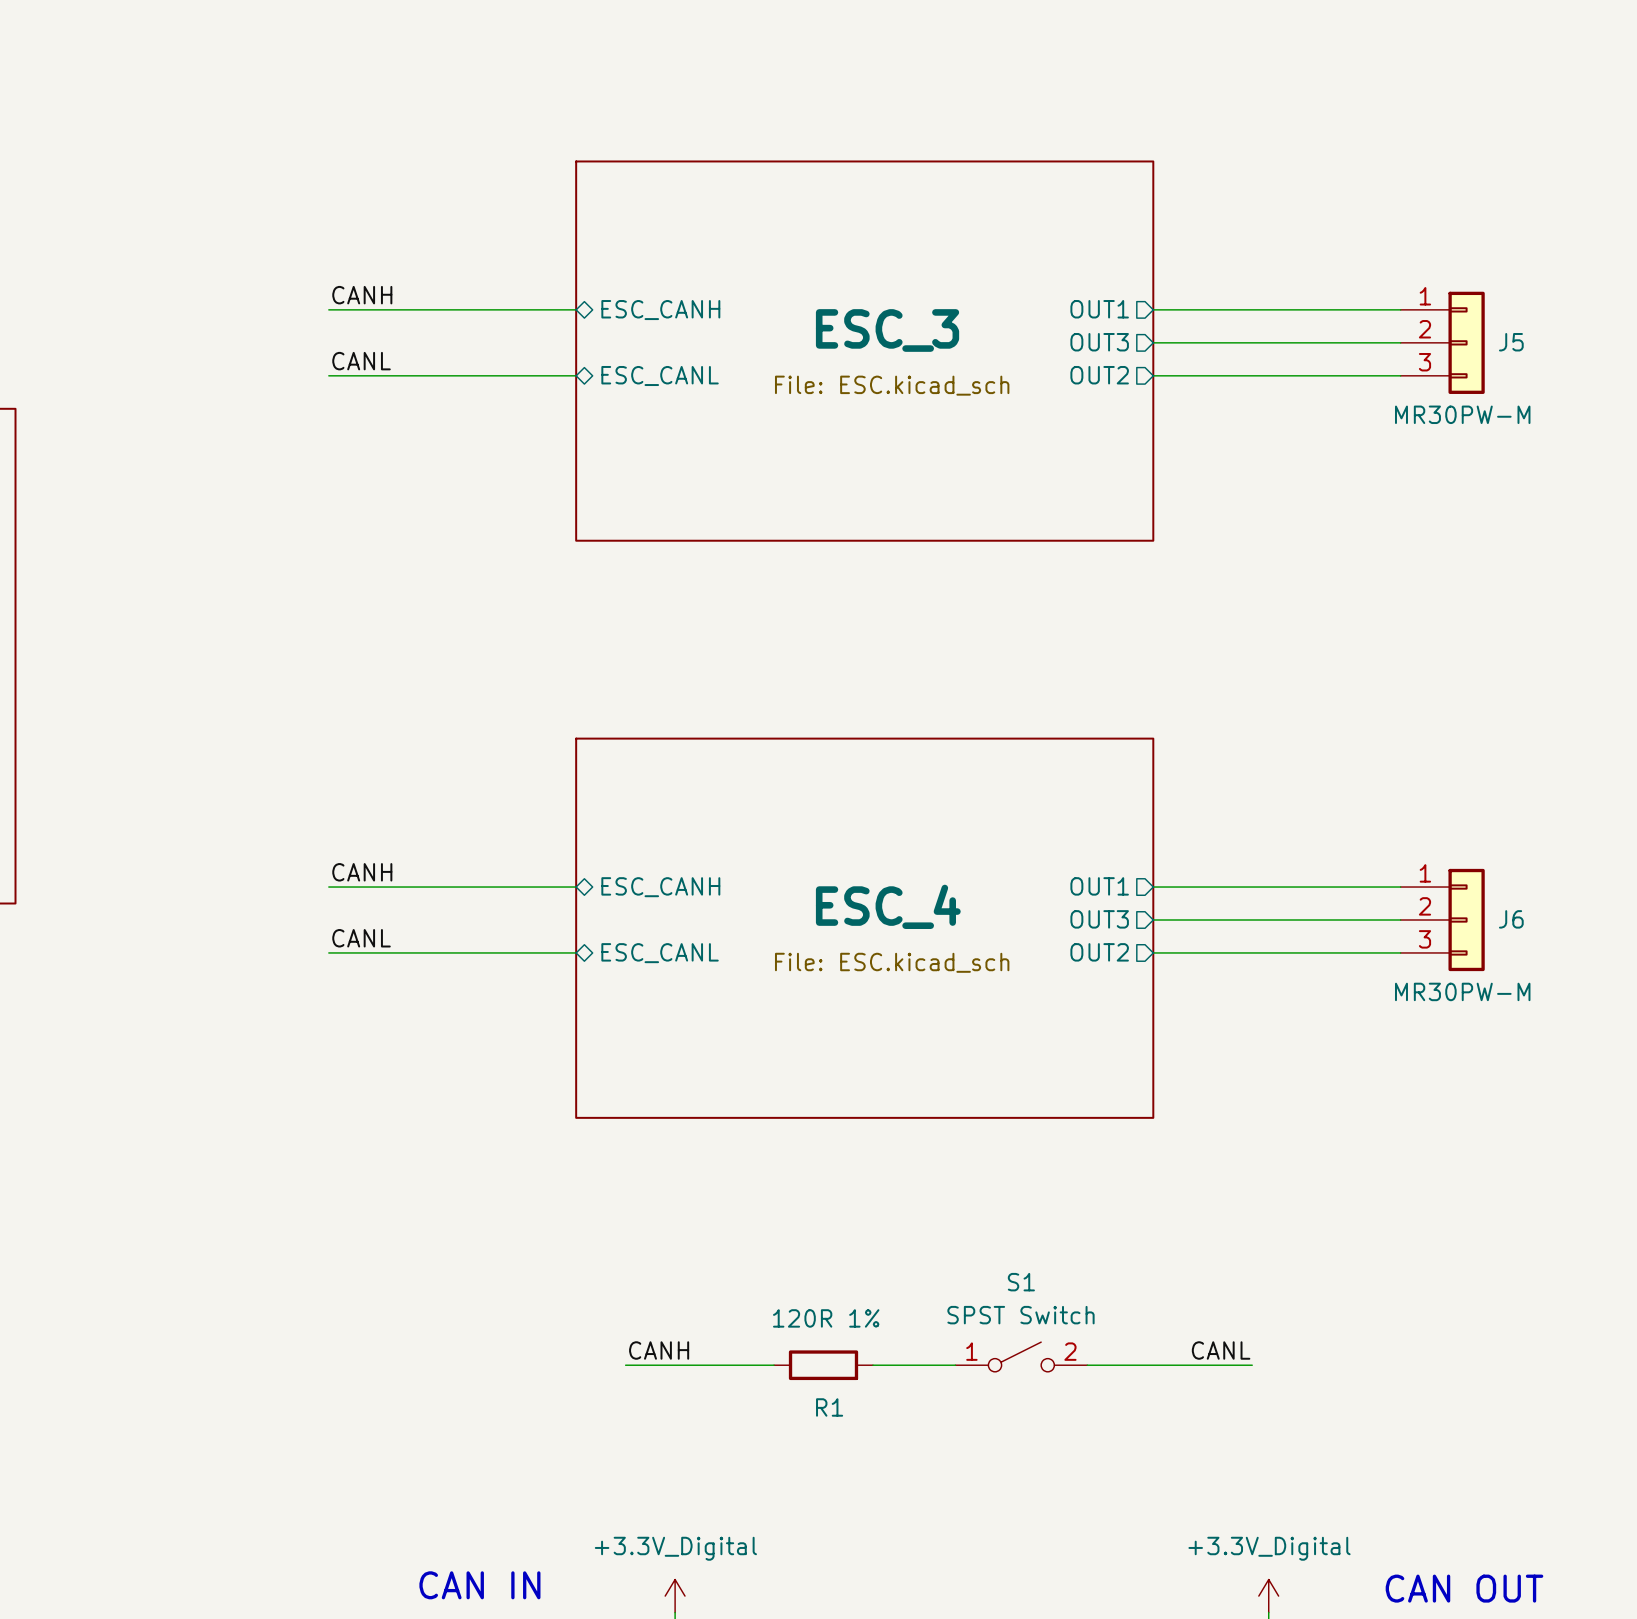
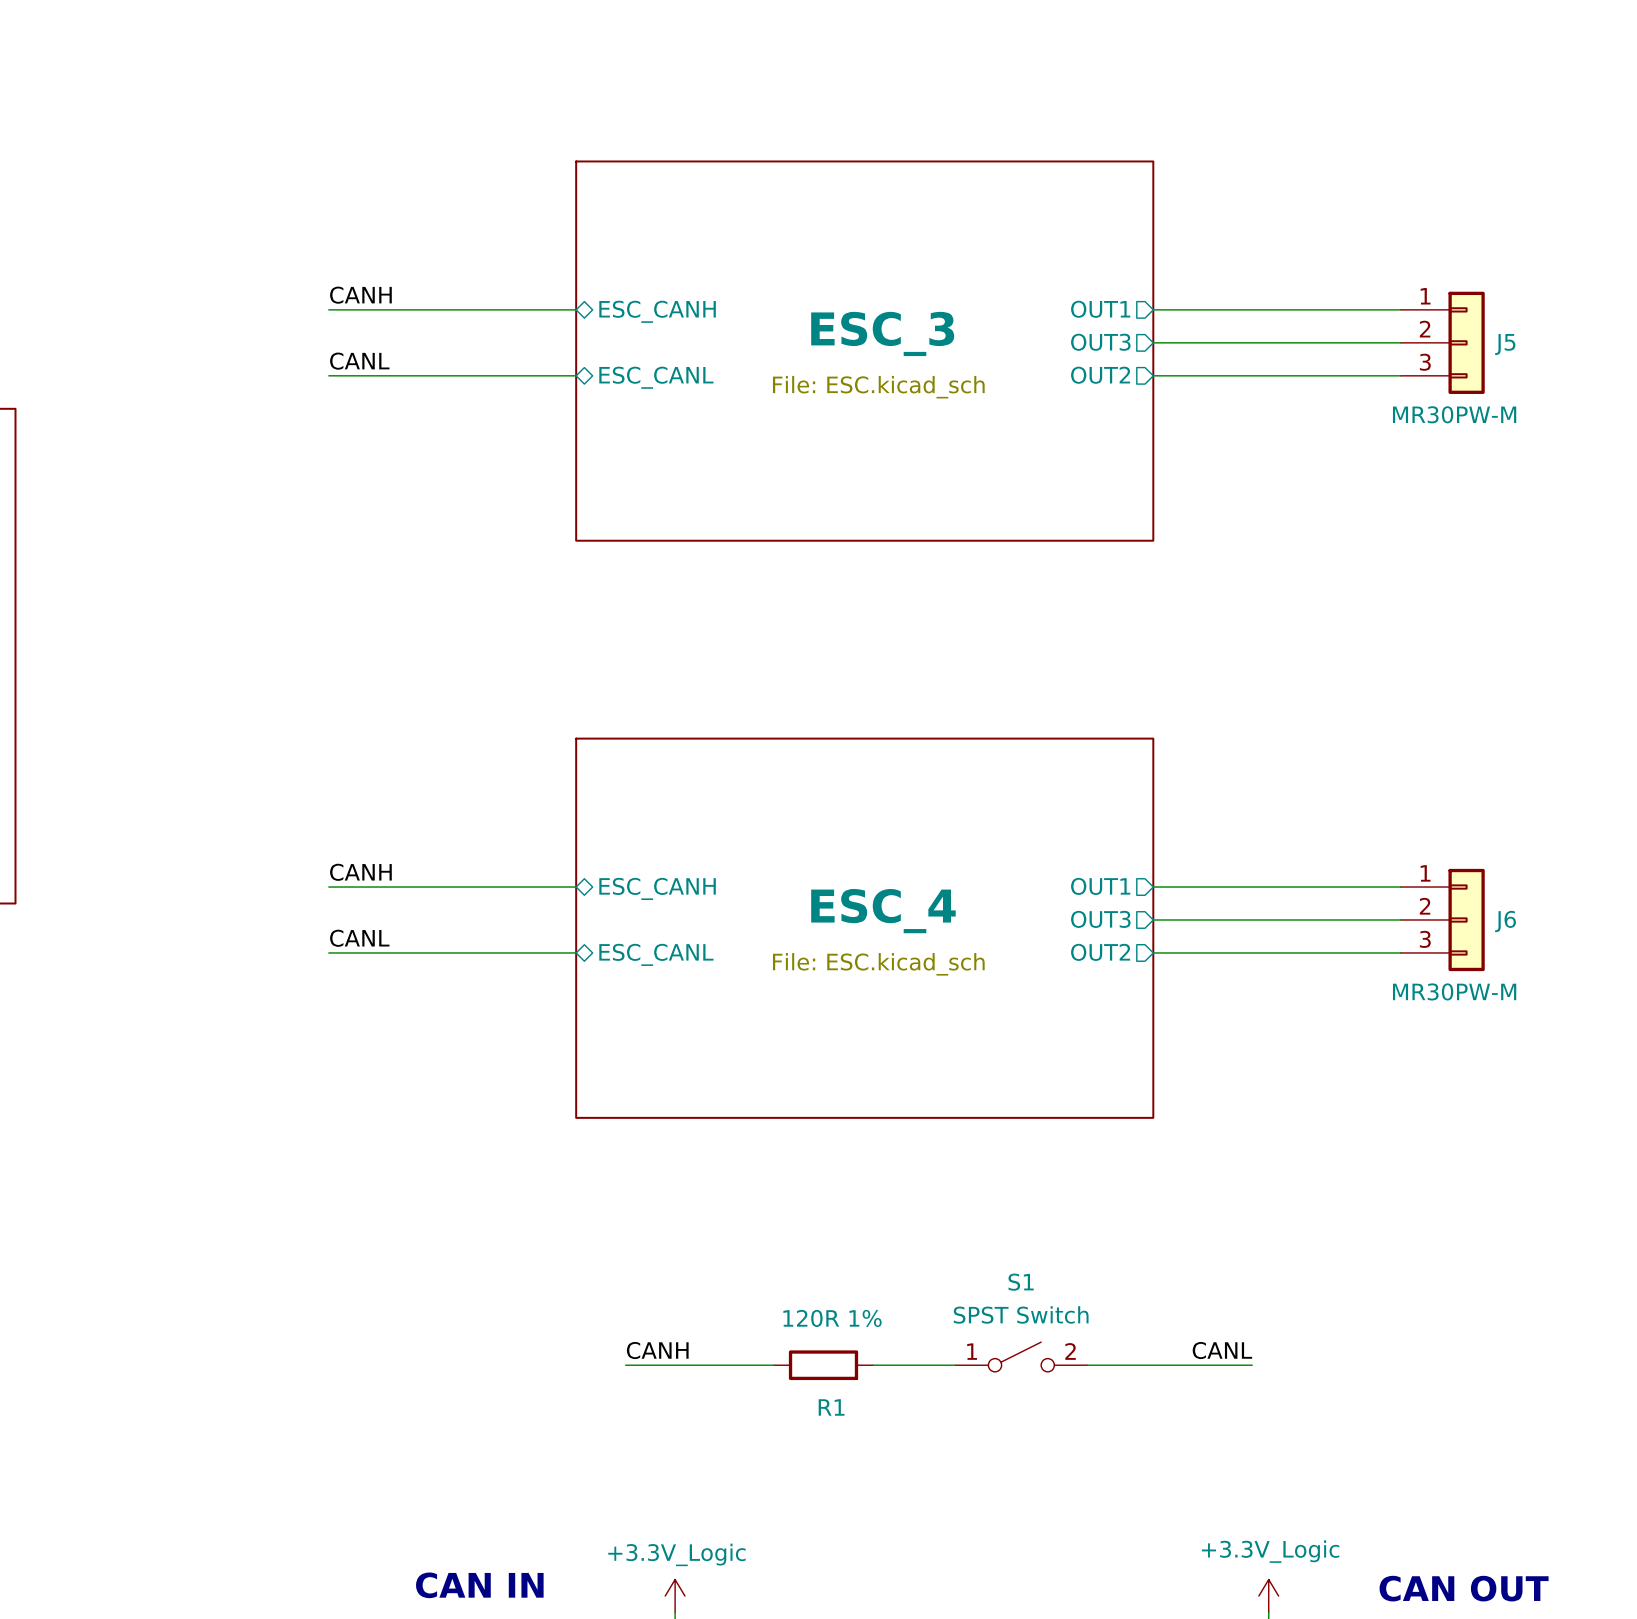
power symbol: +3.3V_Digital (675, 1596) -> +3.3V_Logic (675, 1596)
power symbol: +3.3V_Digital (1268, 1596) -> +3.3V_Logic (1268, 1596)

